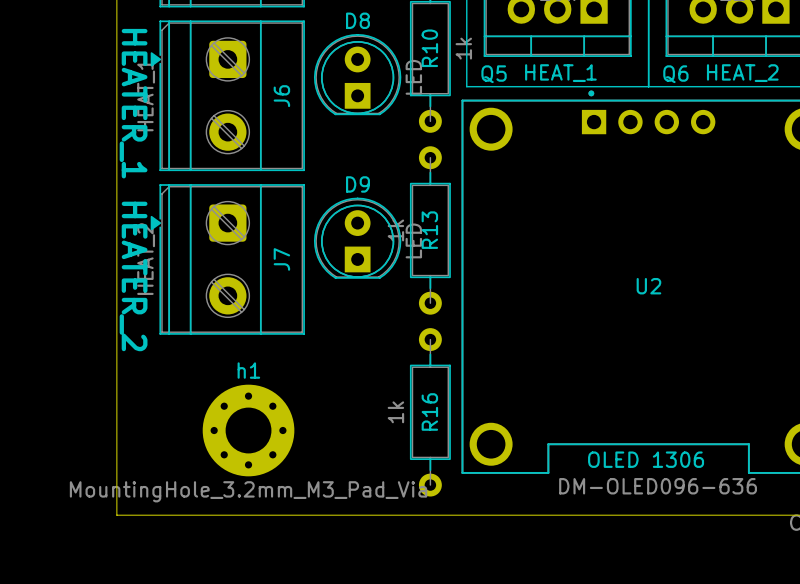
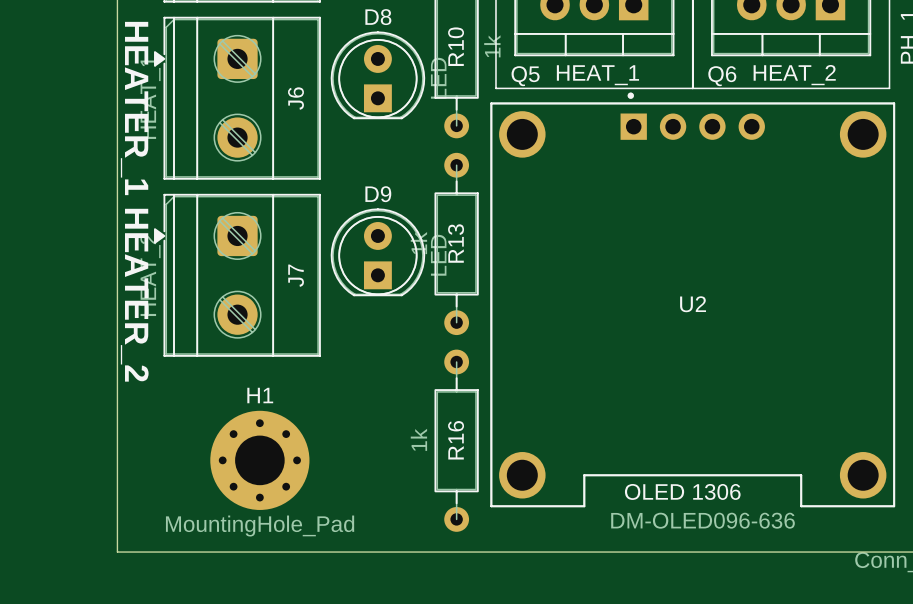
h1 name: h1 (248, 370) -> H1 (260, 395)
h1 value: MountingHole_3.2mm_M3_Pad_Via (248, 491) -> MountingHole_Pad (260, 526)

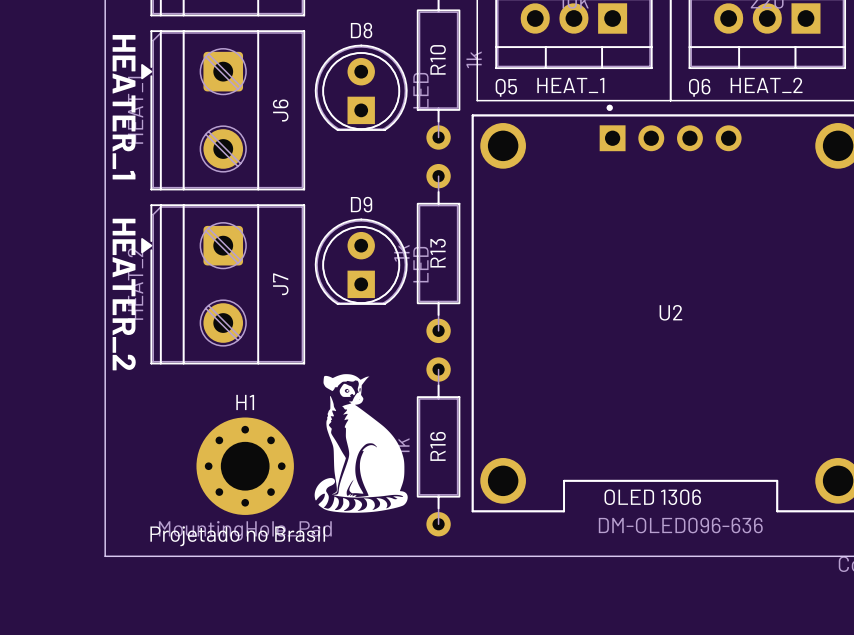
drawing: none -> [314, 374, 408, 513]
text: none -> Projetado no Brasil (237, 536)

